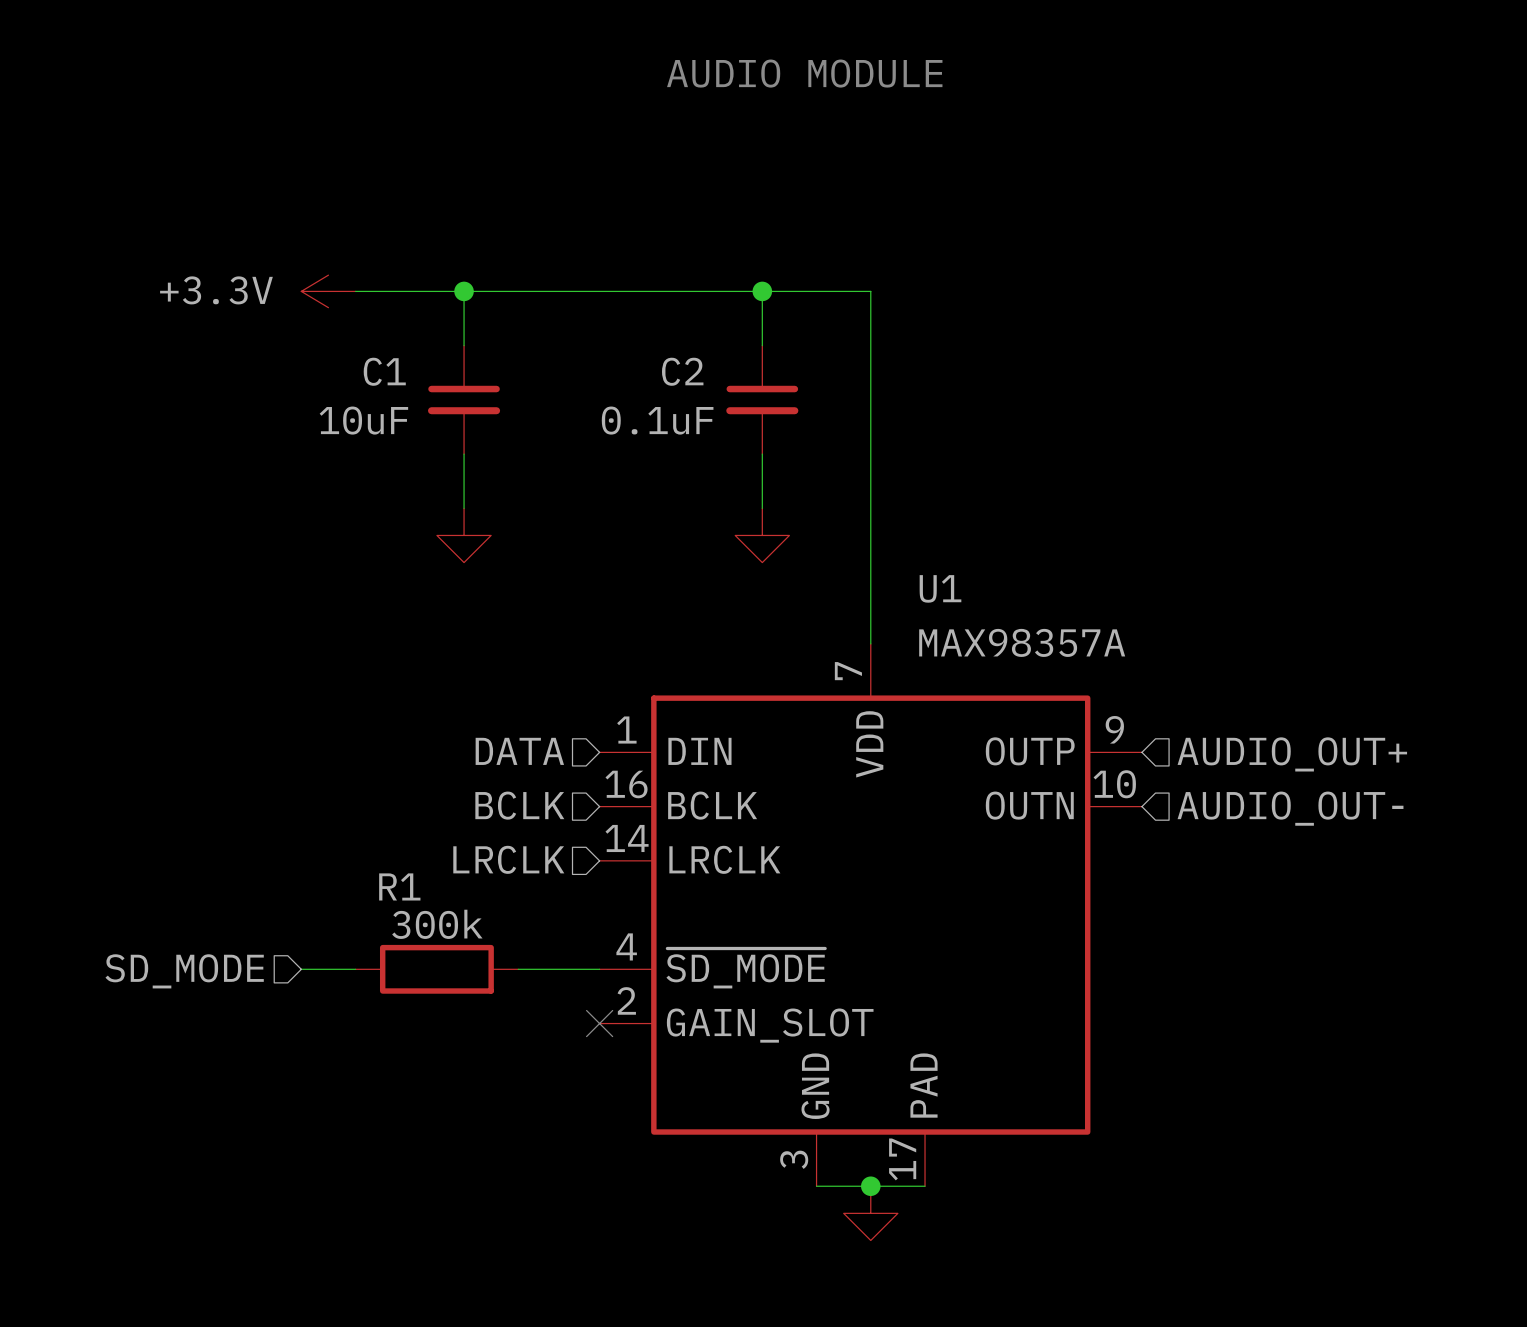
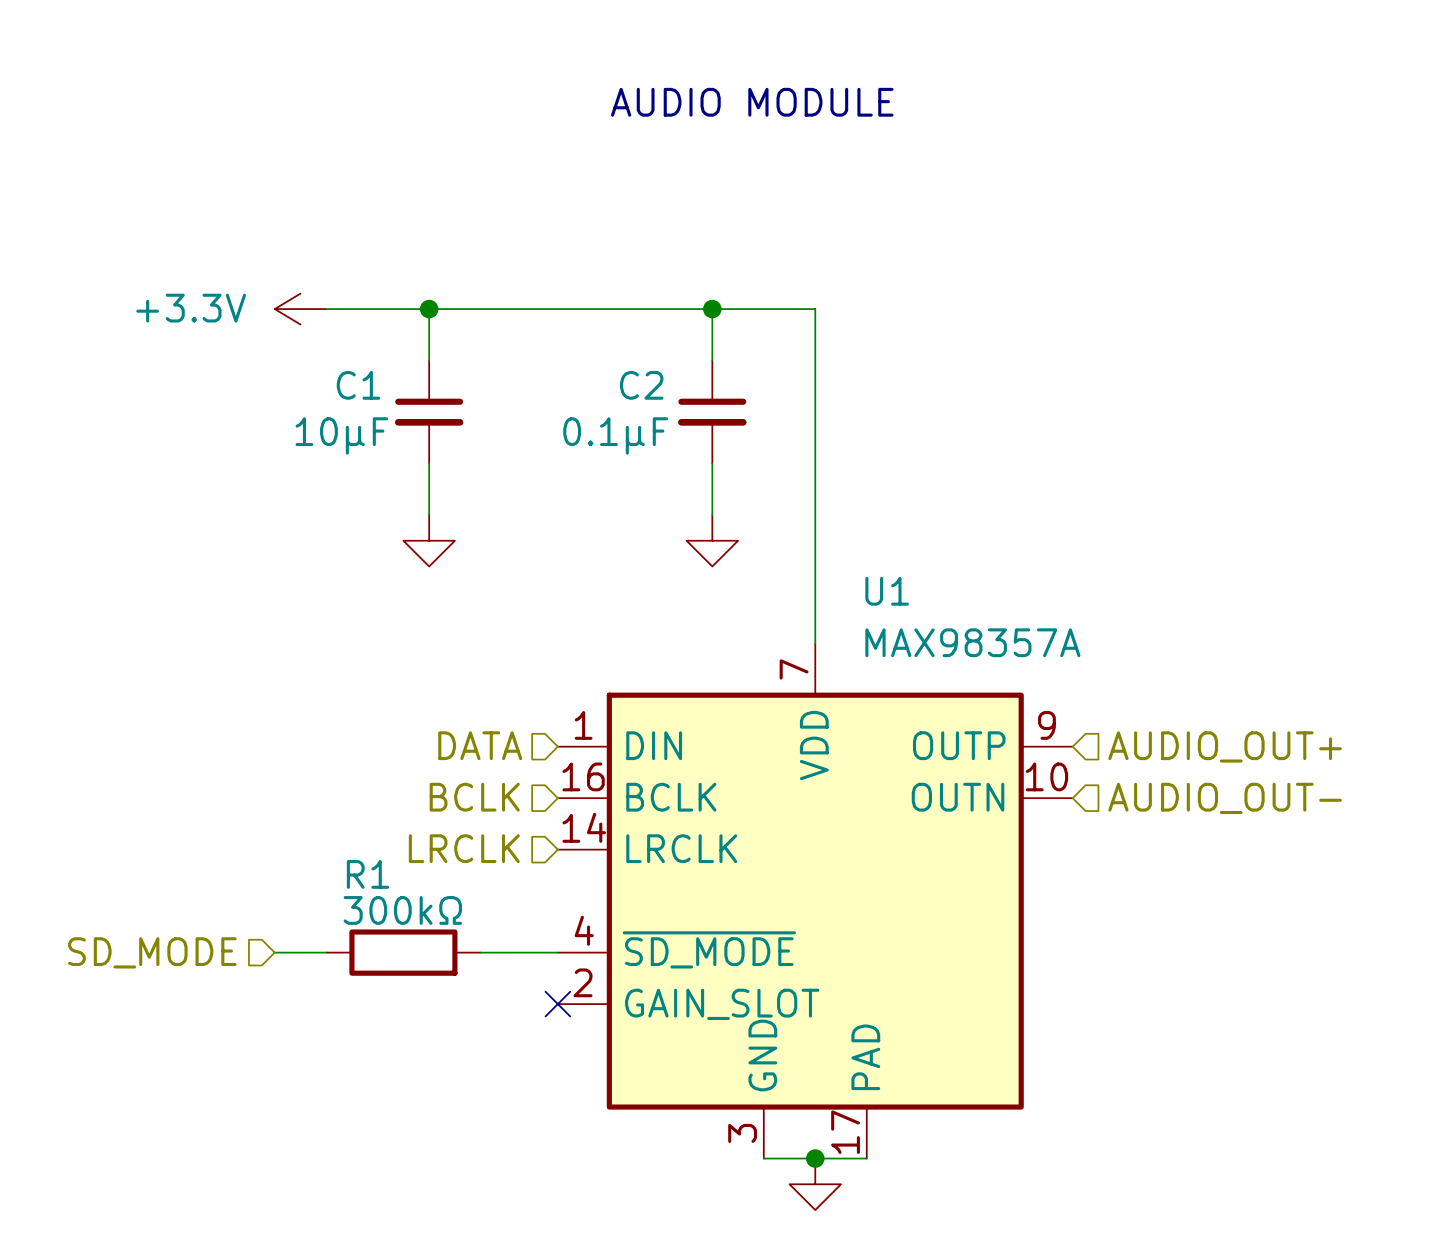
C1 value: 10uF (363, 420) -> 10µF (341, 435)
C2 value: 0.1uF (657, 420) -> 0.1µF (615, 435)
R1 value: 300k (437, 924) -> 300kΩ (402, 910)

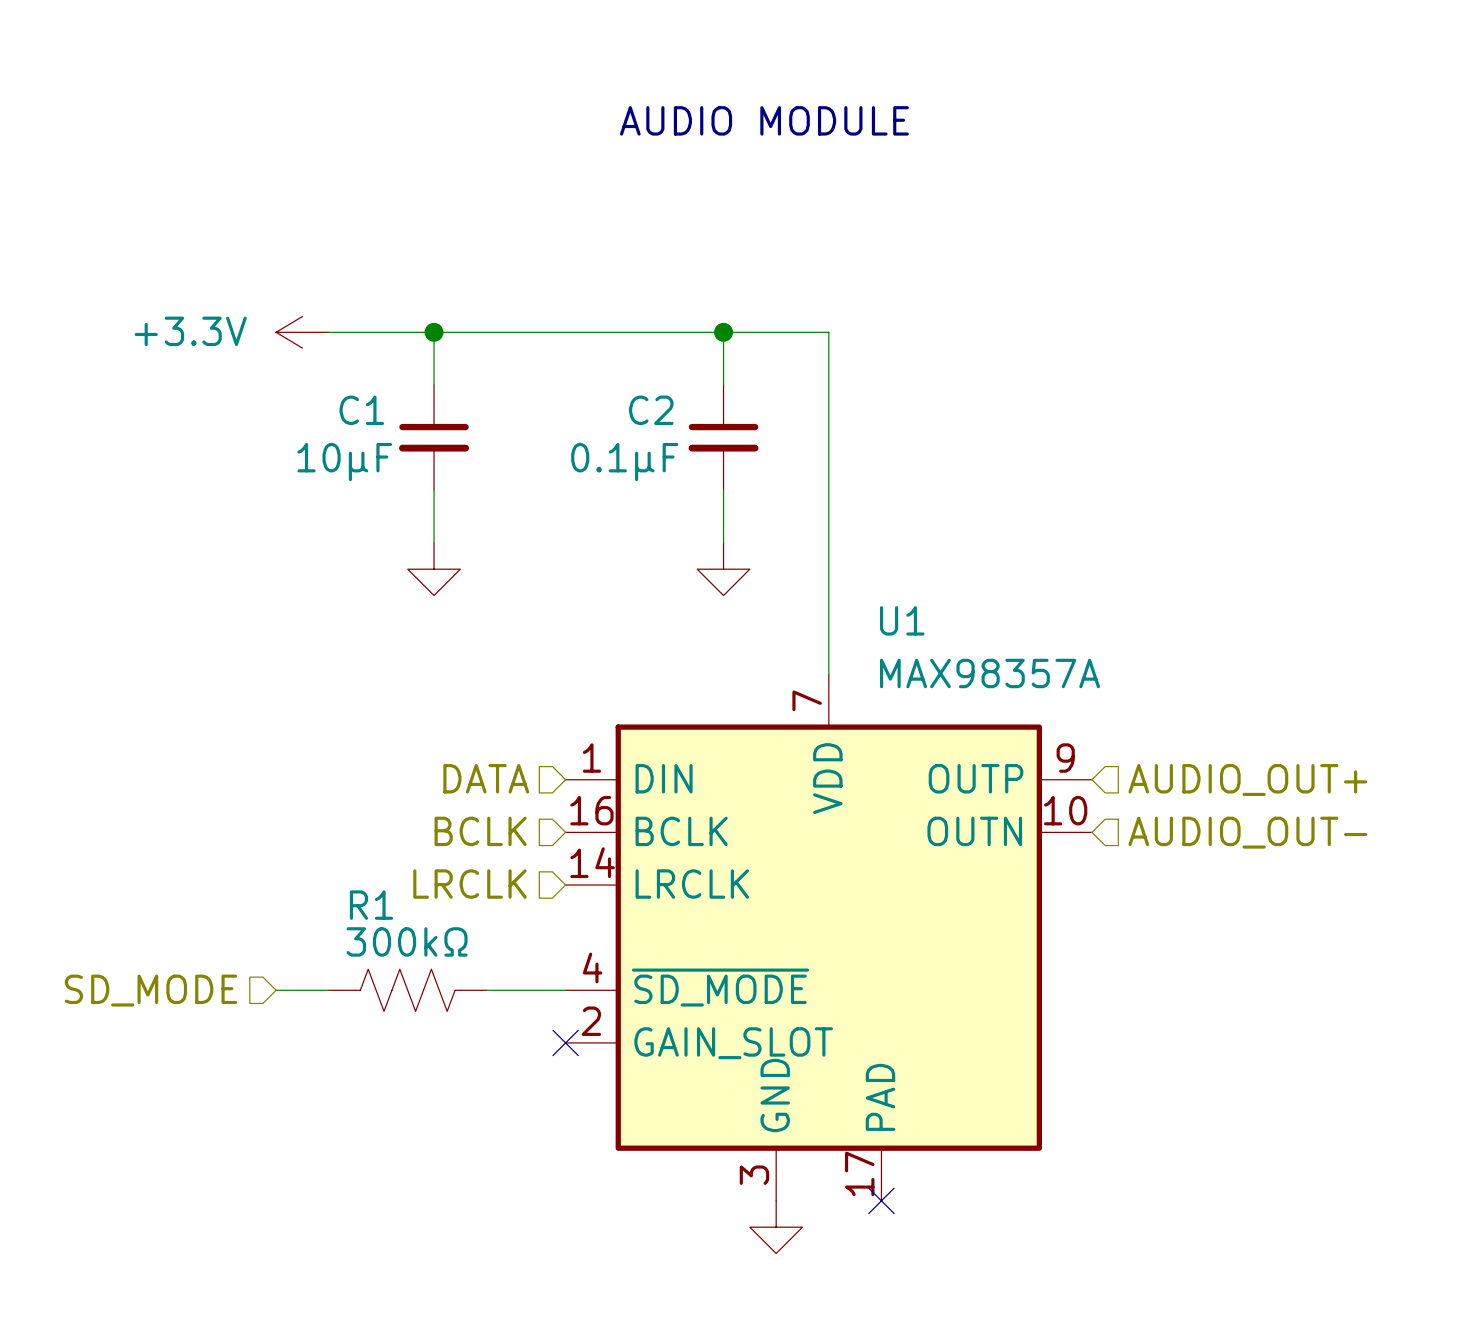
R1 symbol: [326, 929, 481, 976] -> [328, 969, 487, 1012]
wire: (763, 1158) (866, 1158) -> none
junction: (815, 1158) -> none
no-connect mark: none -> (881, 1200)
power symbol position: (815, 1184) -> (776, 1227)

